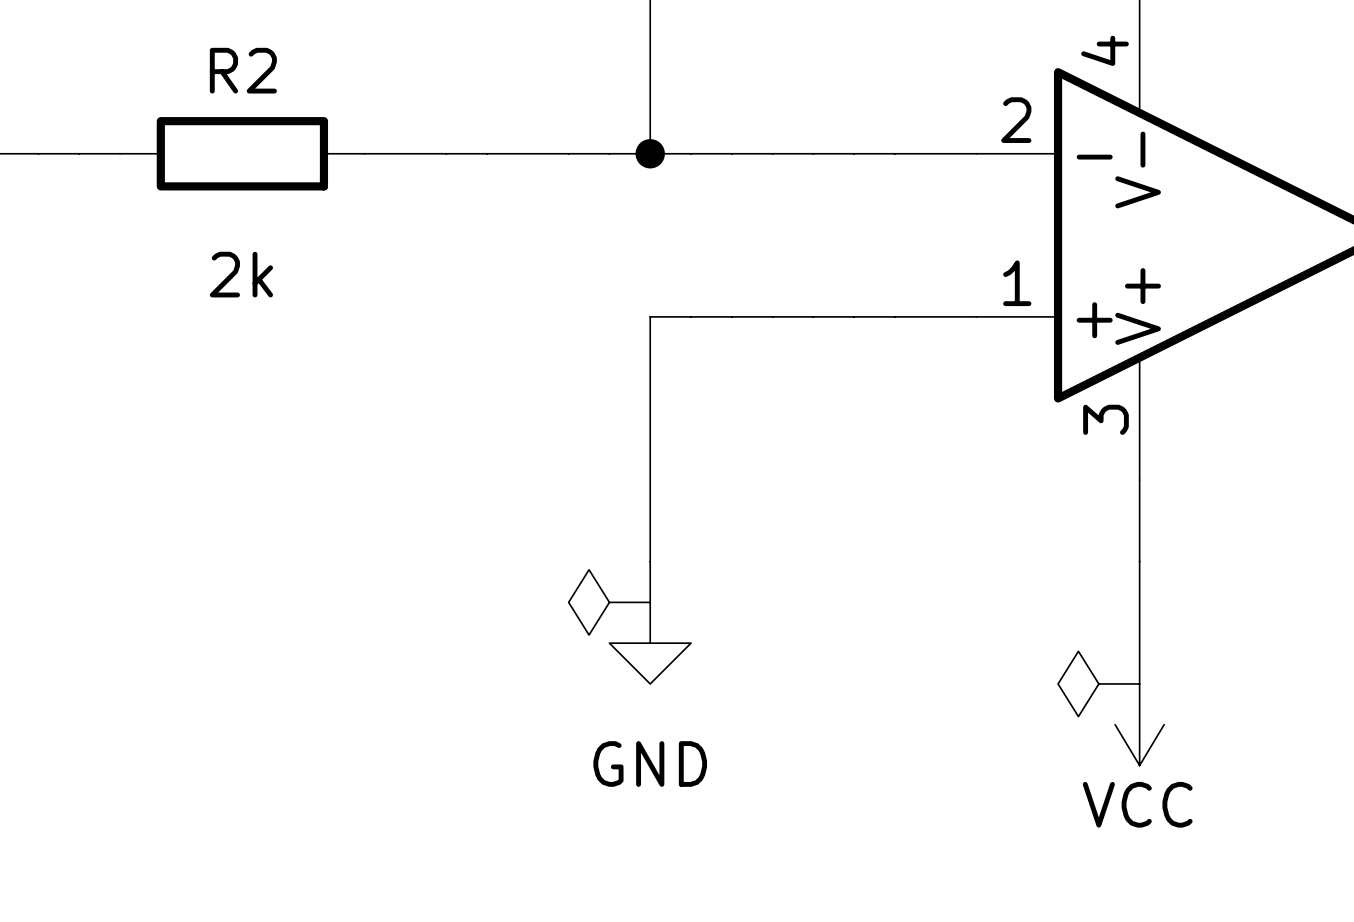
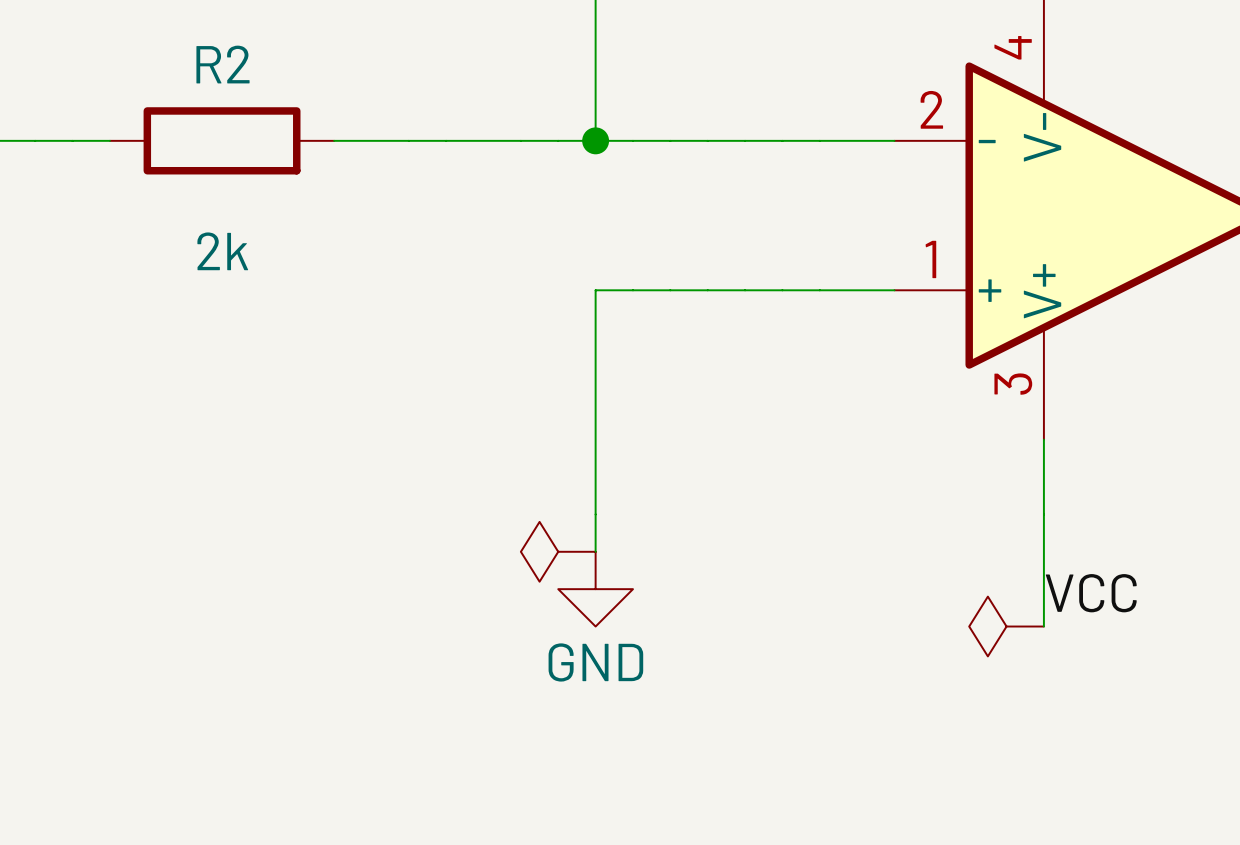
label: none -> VCC (1091, 593)
power symbol: VCC (1139, 724) -> none
power symbol text position: GND (650, 763) -> GND (595, 662)

